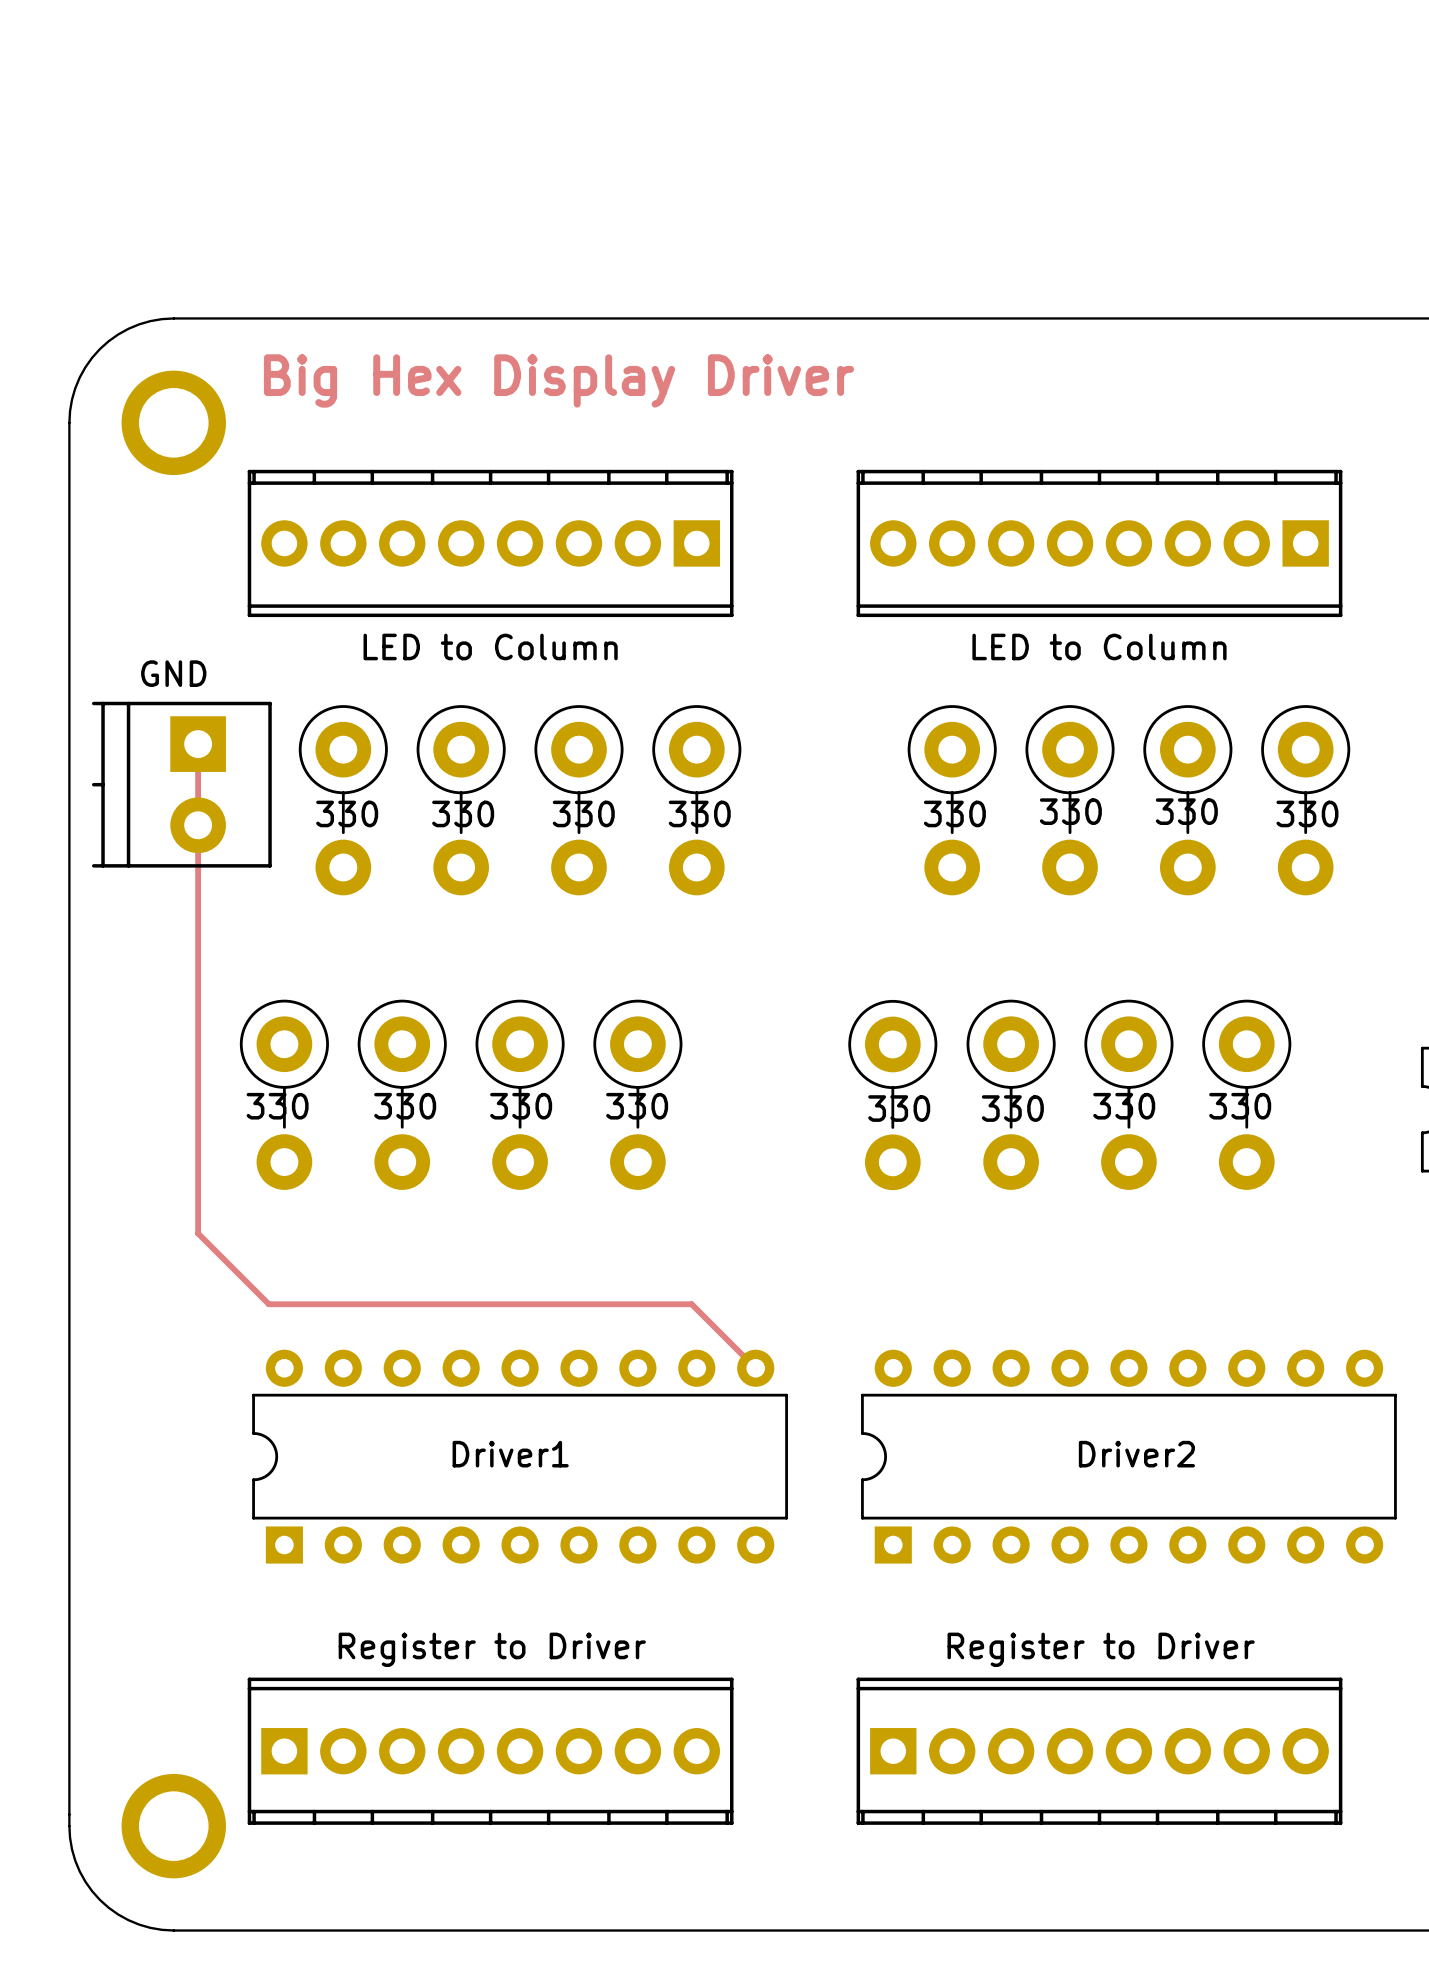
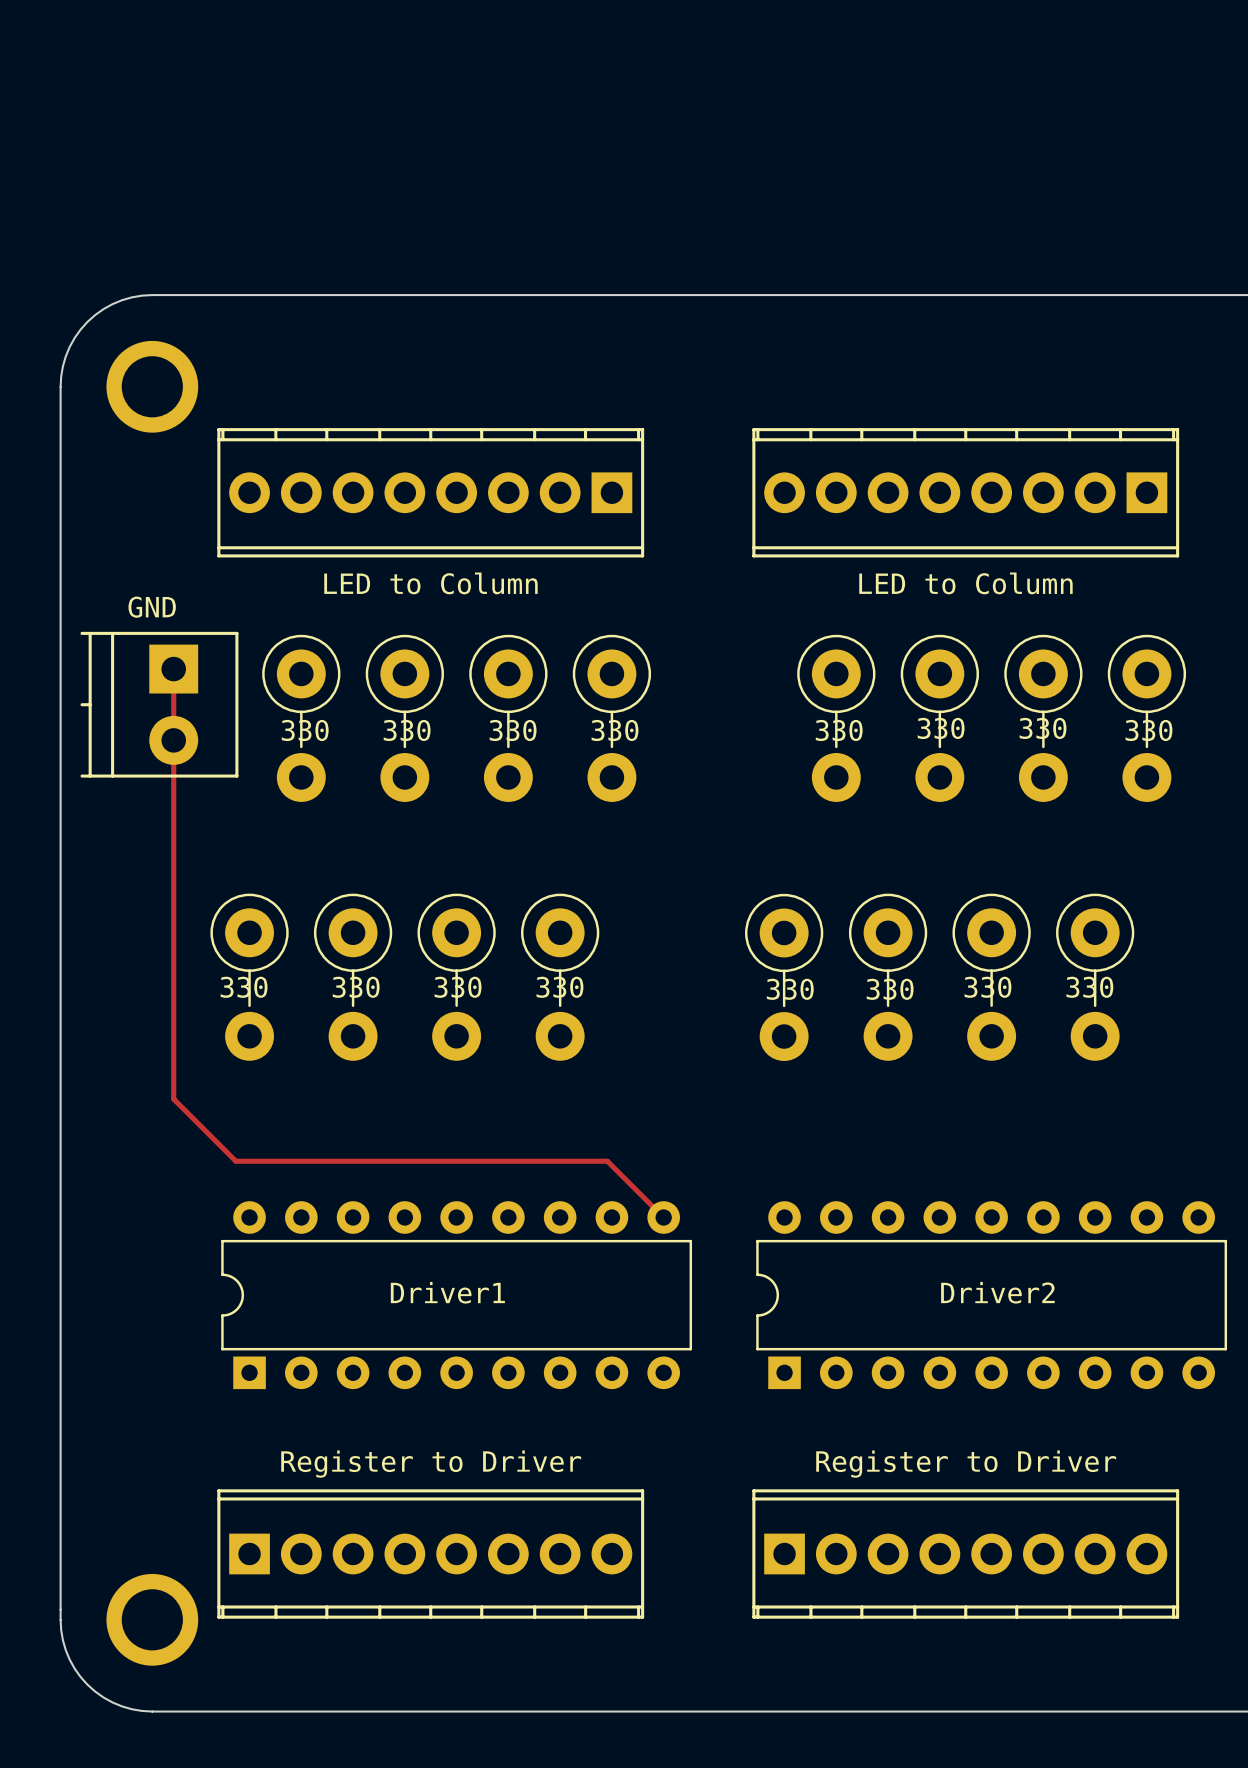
text: Big Hex Display Driver (558, 380) -> none

